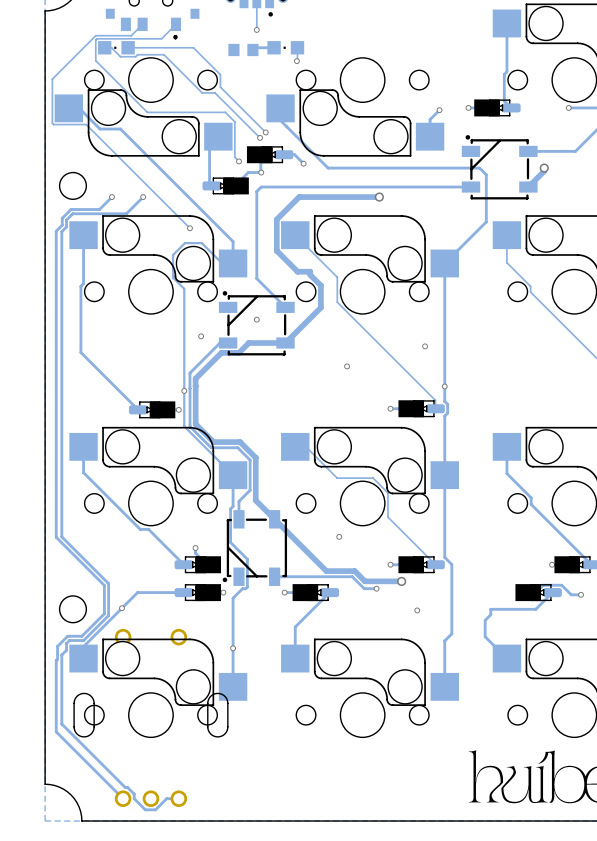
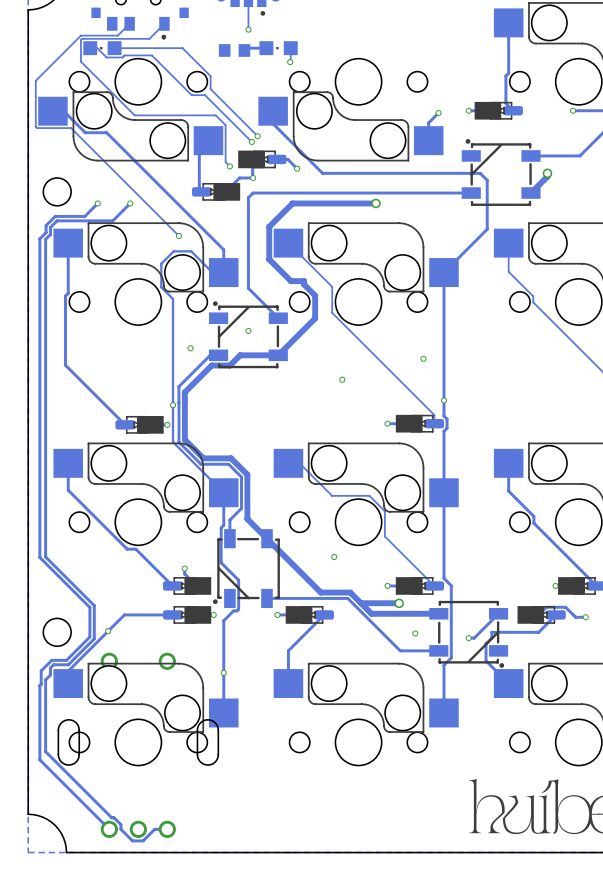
track: none -> (360, 603) (371, 613) (438, 613)
track: (376, 588) (364, 588) -> (438, 650) (400, 650) (360, 610)
via: (376, 588) -> none
track: none -> (498, 613) (474, 638) (468, 638)
part: none -> (468, 634)
via: none -> (468, 638)

